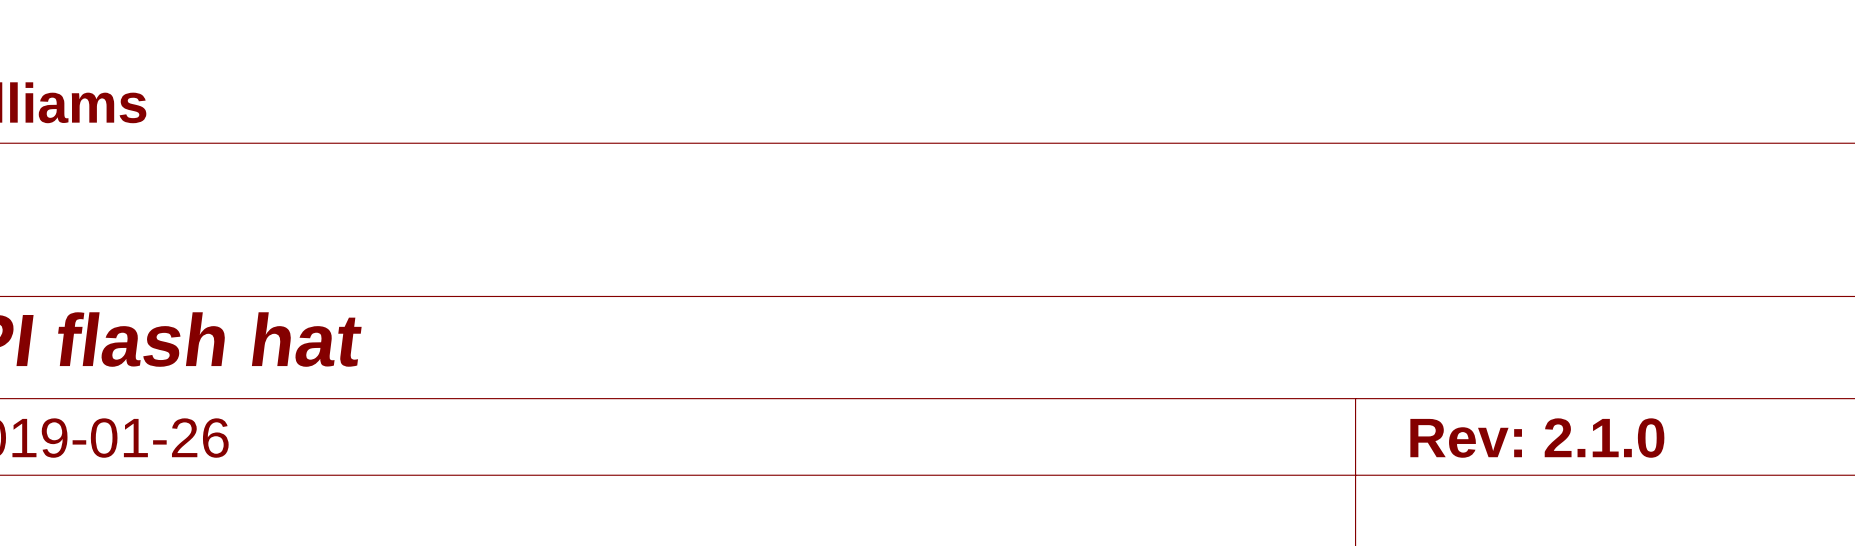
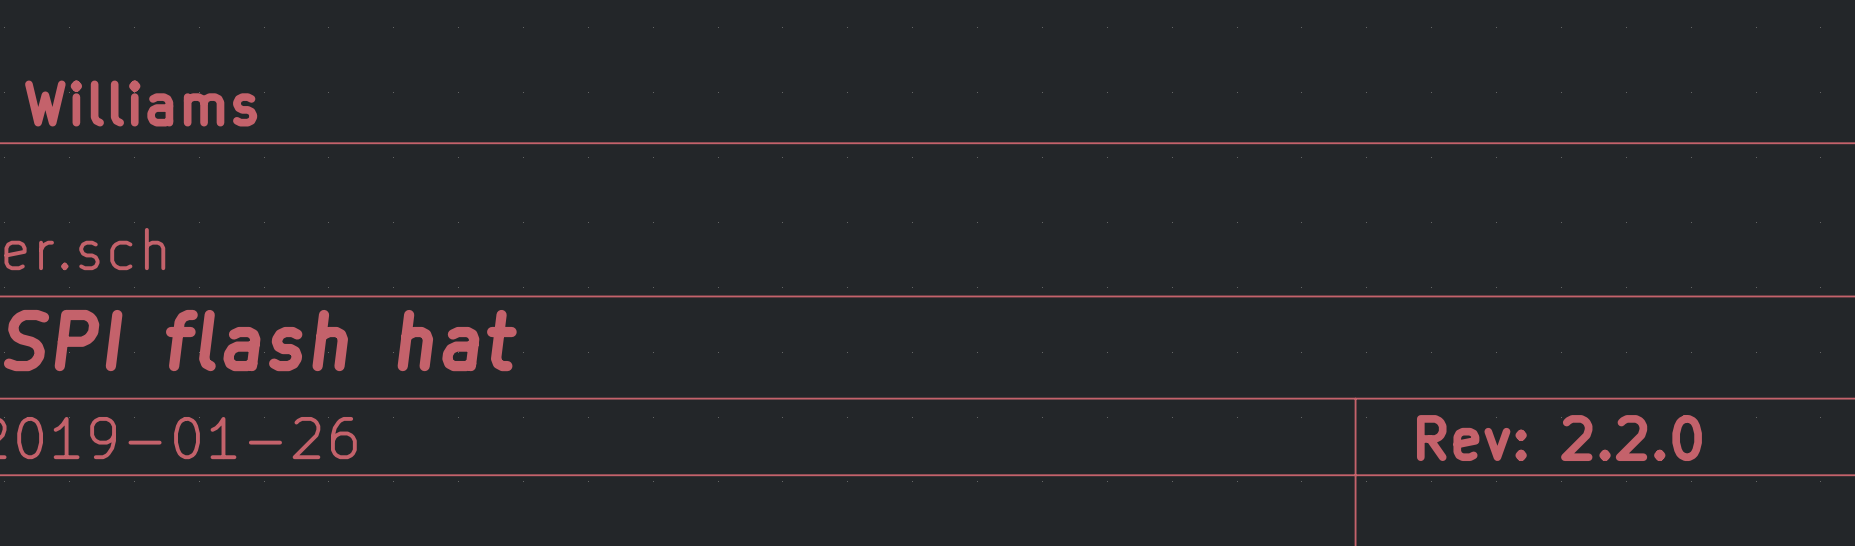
title block: Rev: 2.1.0 (1537, 438) -> Rev: 2.2.0 (1559, 438)

